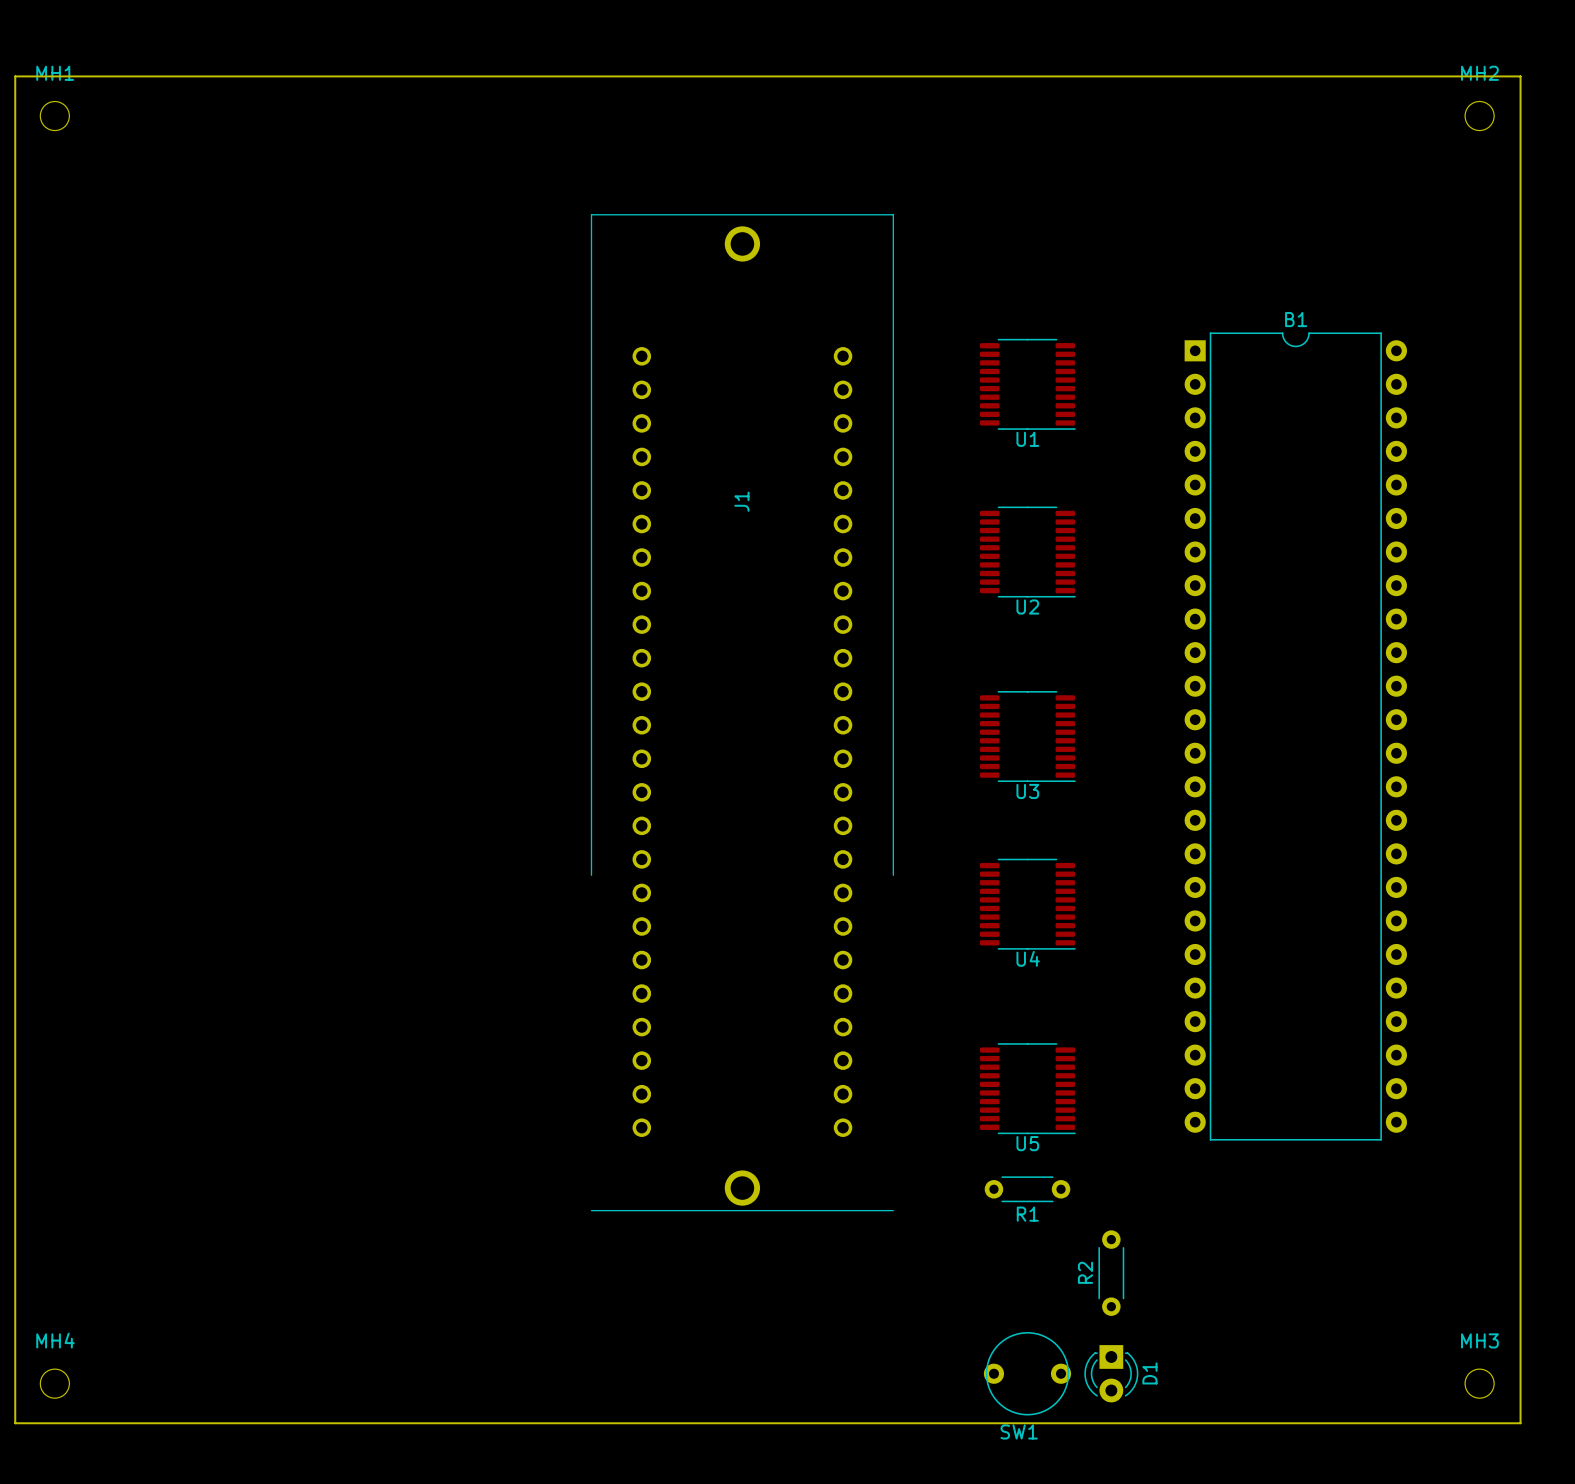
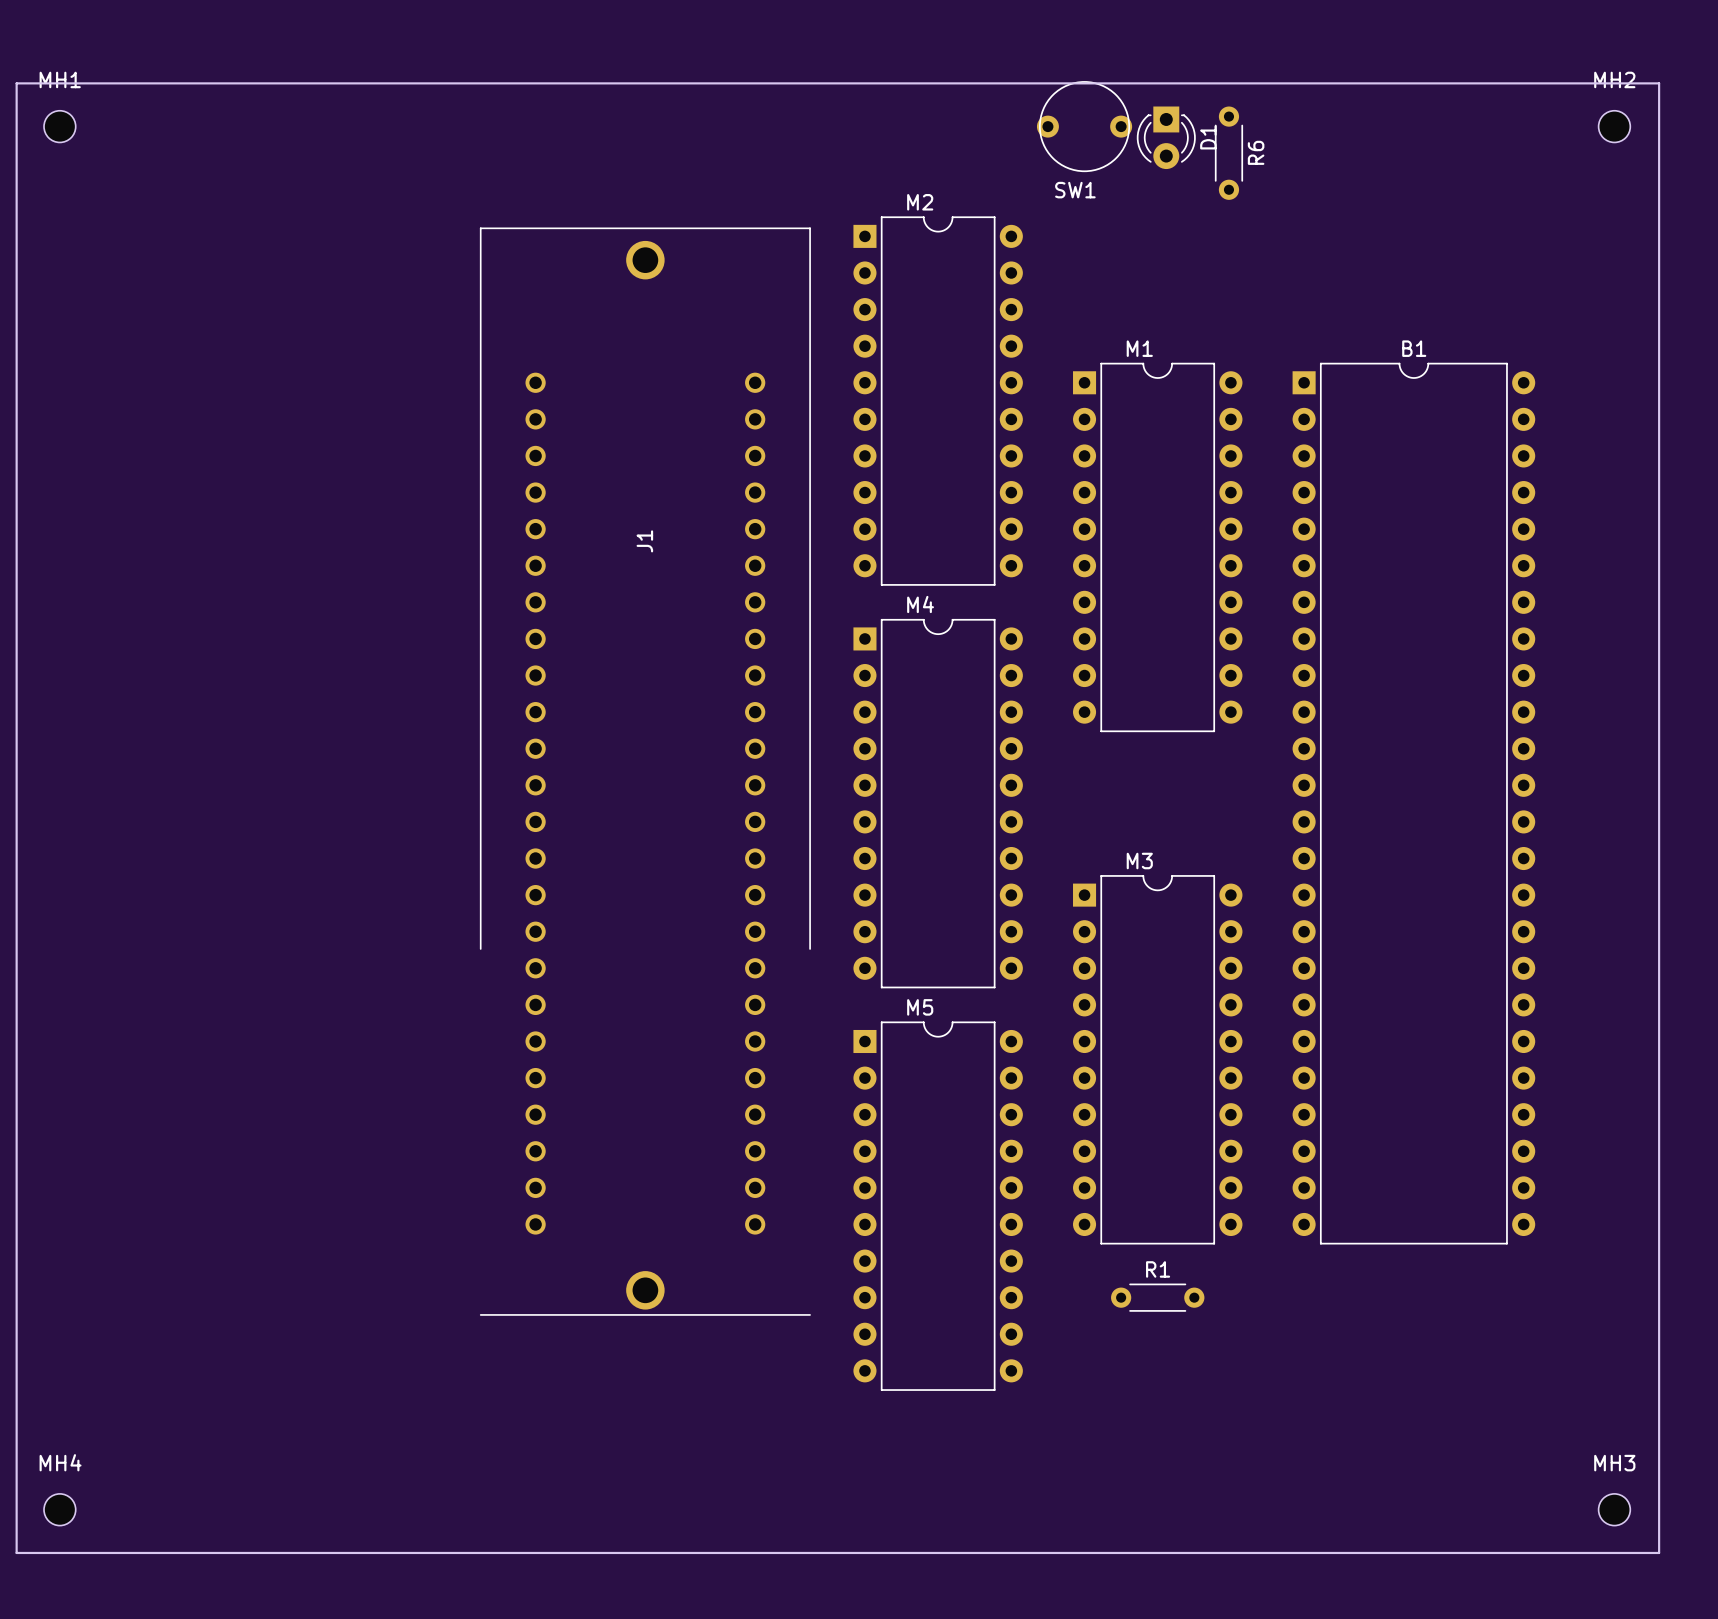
R6: none -> (1228, 153)
M2: none -> (938, 401)
U1: (1027, 384) -> none
M1: none -> (1157, 547)
U2: (1027, 552) -> none
J1 position: (742, 712) -> (645, 771)
M4: none -> (938, 803)
U3: (1027, 736) -> none
U4: (1027, 904) -> none
M3: none -> (1157, 1059)
U5: (1027, 1088) -> none
M5: none -> (938, 1206)
R1 position: (1027, 1189) -> (1157, 1297)
R1 name position: R1 (1027, 1214) -> R1 (1158, 1269)
R2: (1111, 1273) -> none
D1 footprint: [1084, 1345, 1139, 1403] -> [1136, 106, 1196, 170]
SW1 position: (1027, 1373) -> (1084, 126)

